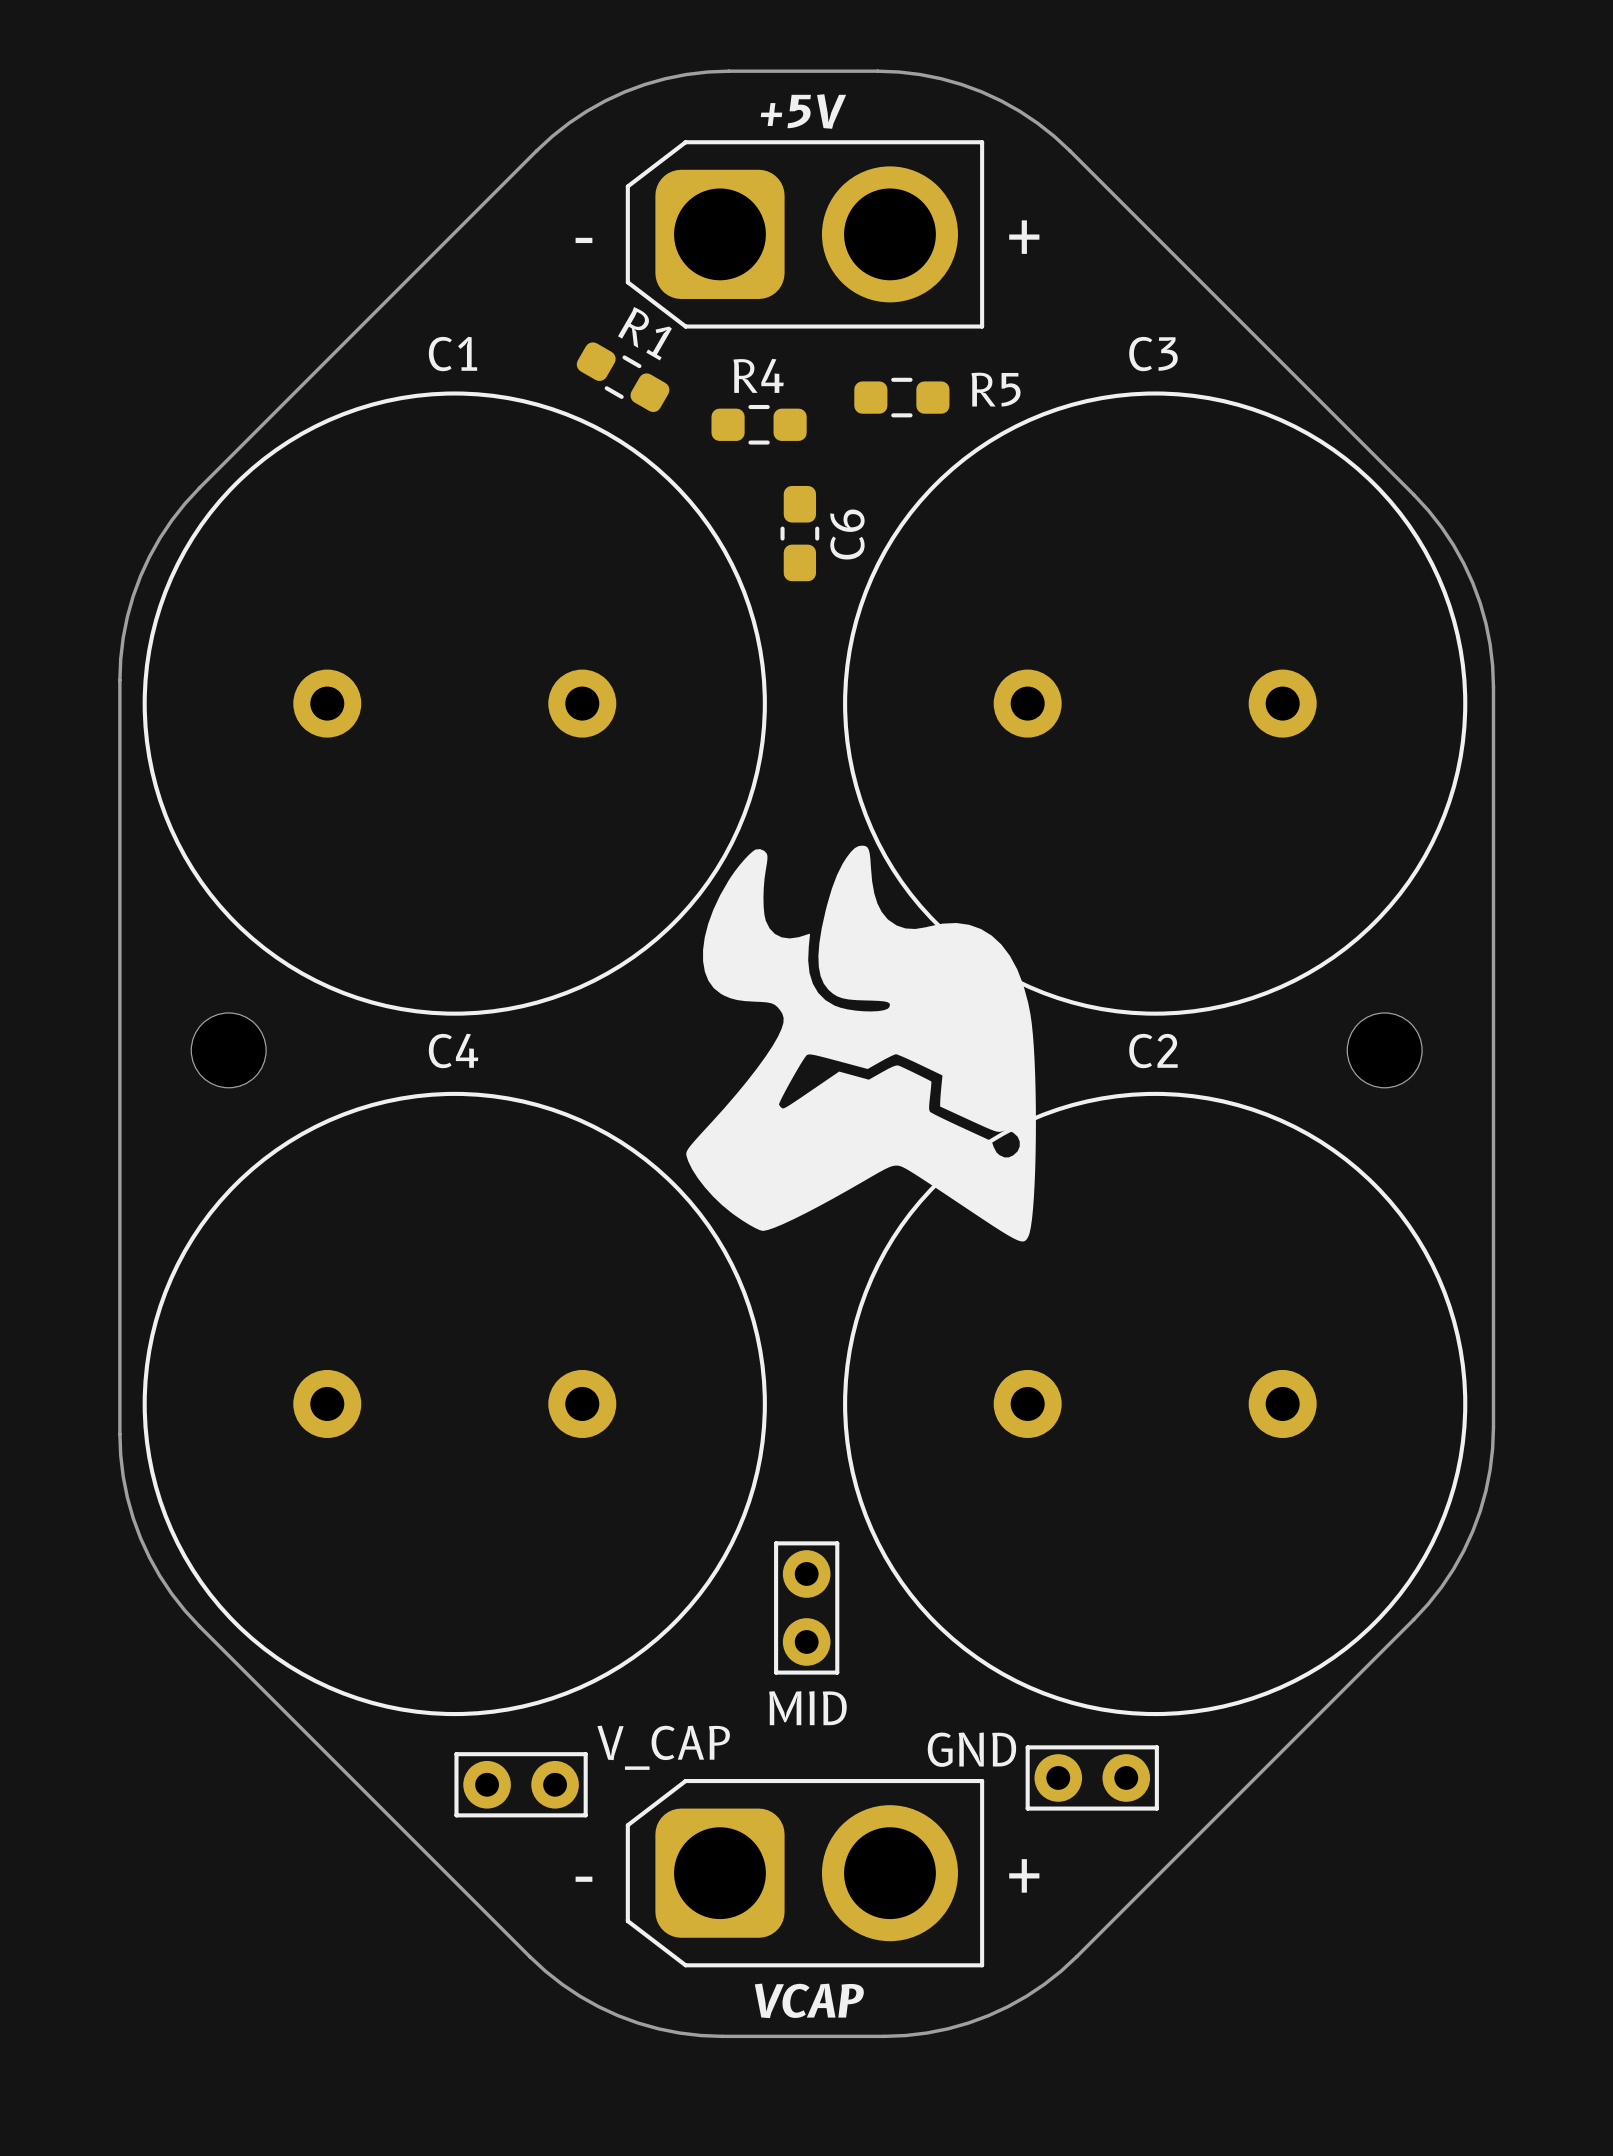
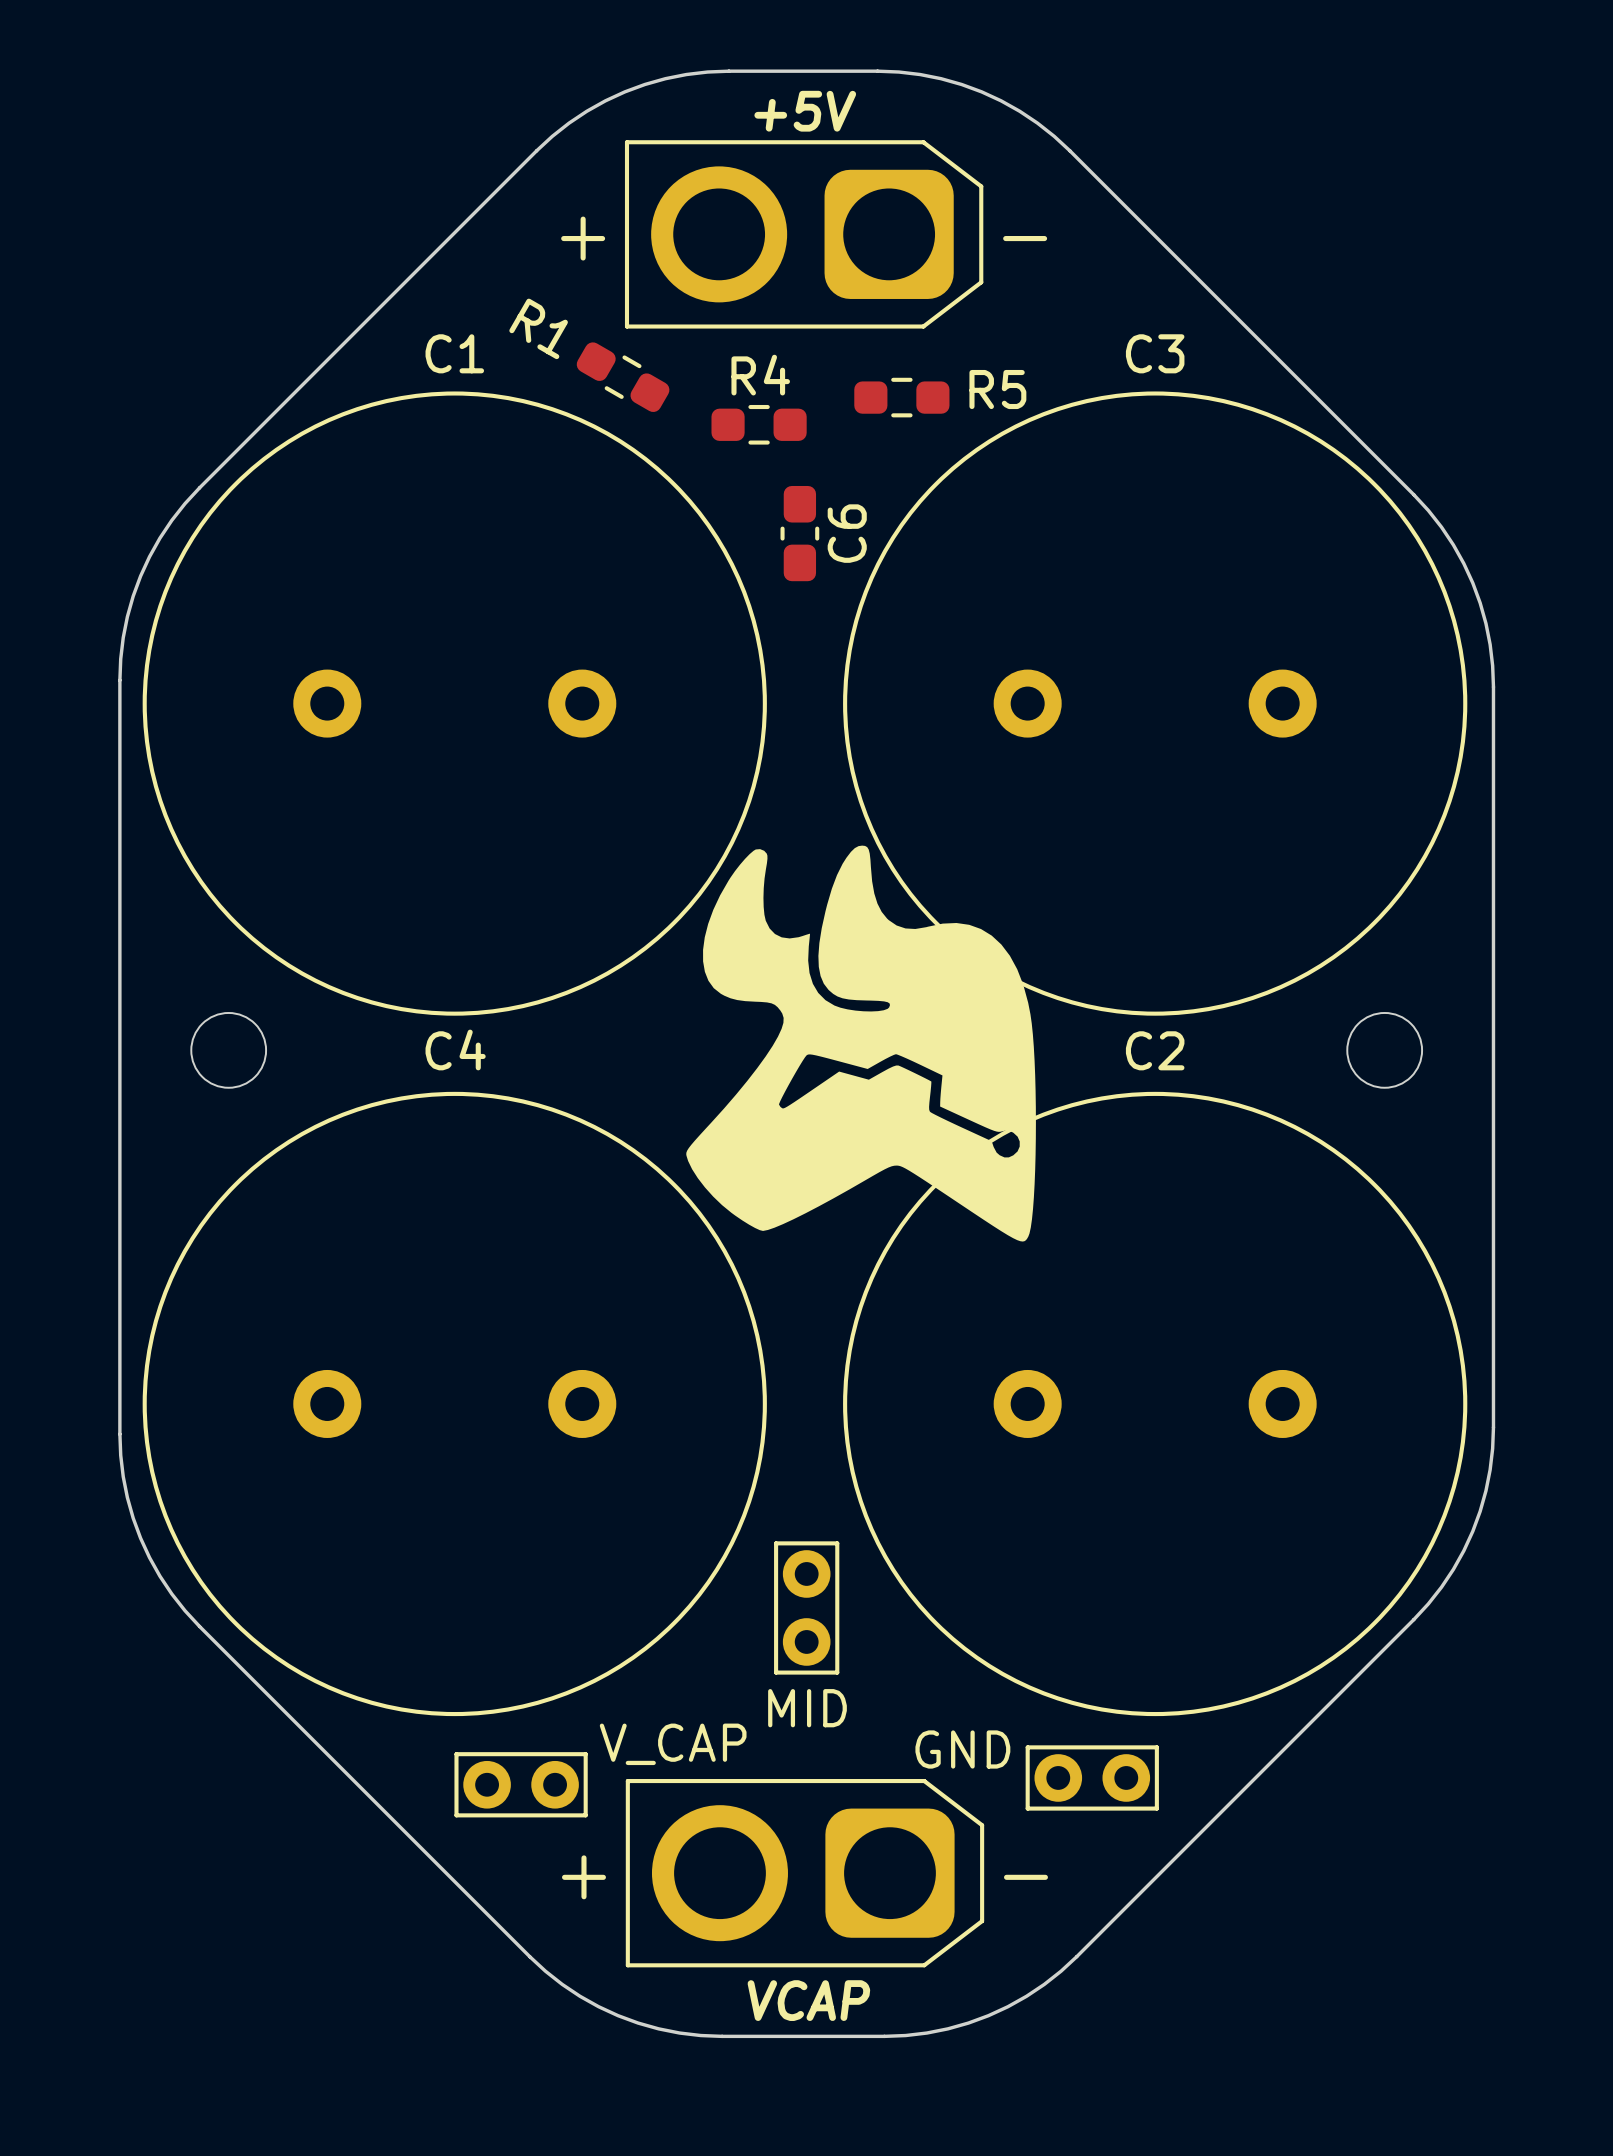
part rotation: 0° (804, 234) -> 180° (804, 234)
R1 name position: R1 (644, 333) -> R1 (538, 328)
part rotation: 0° (804, 1873) -> 180° (804, 1873)

